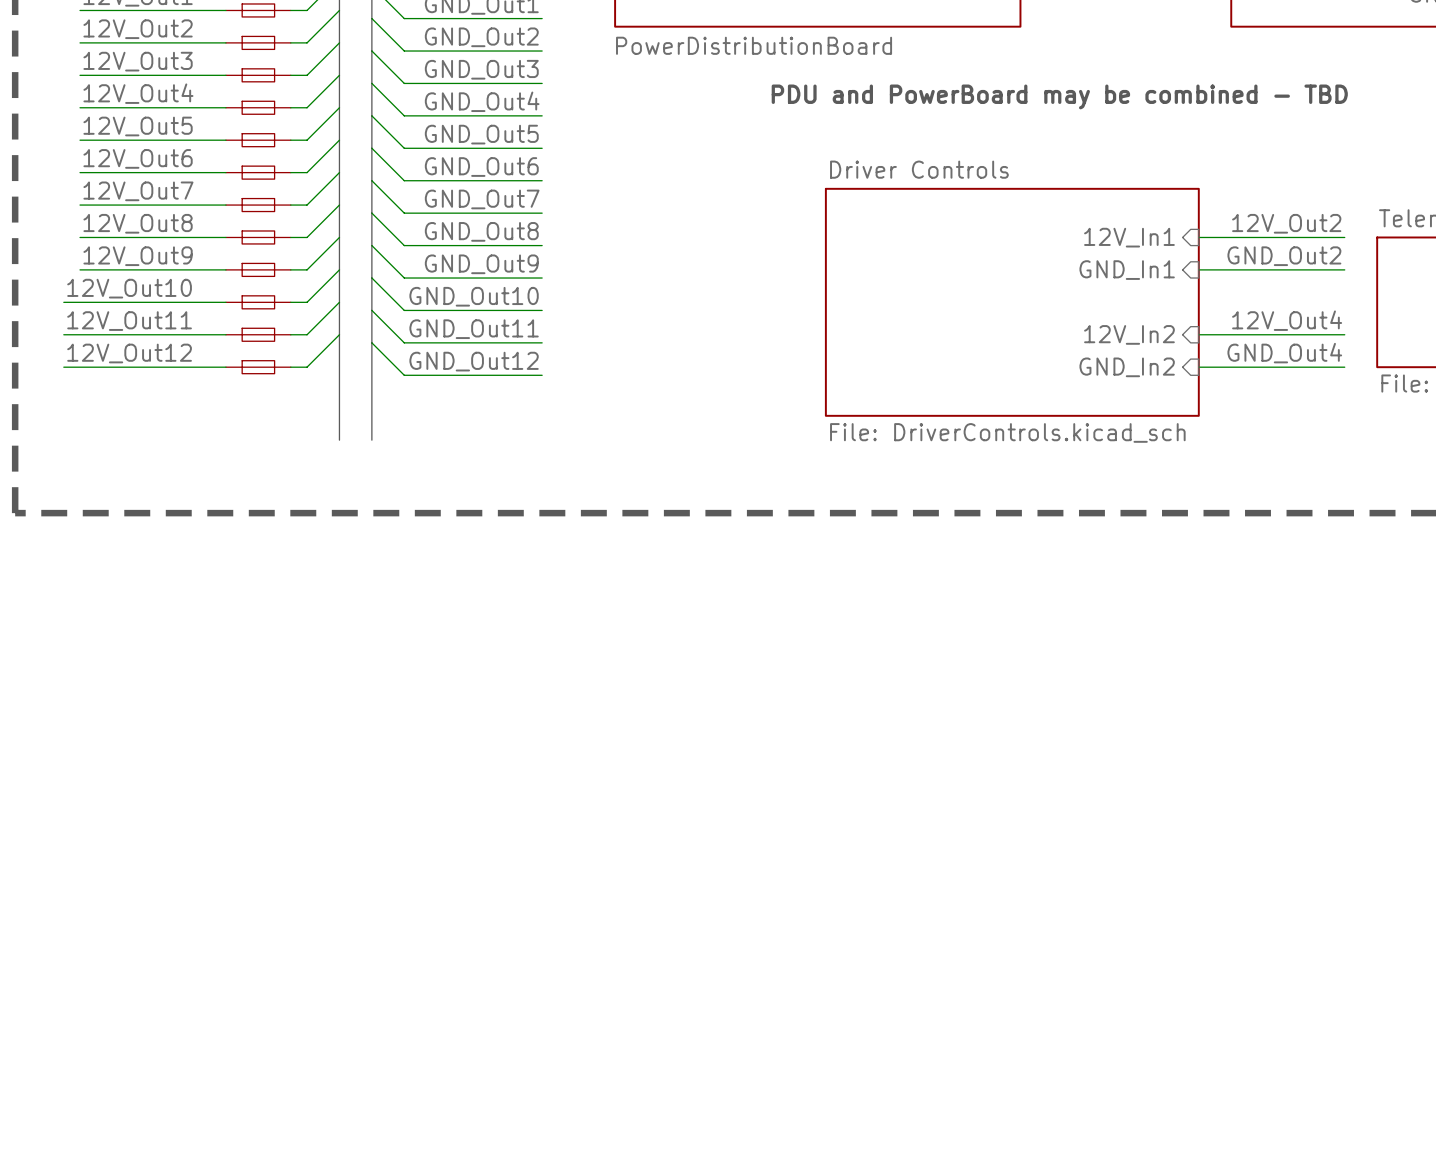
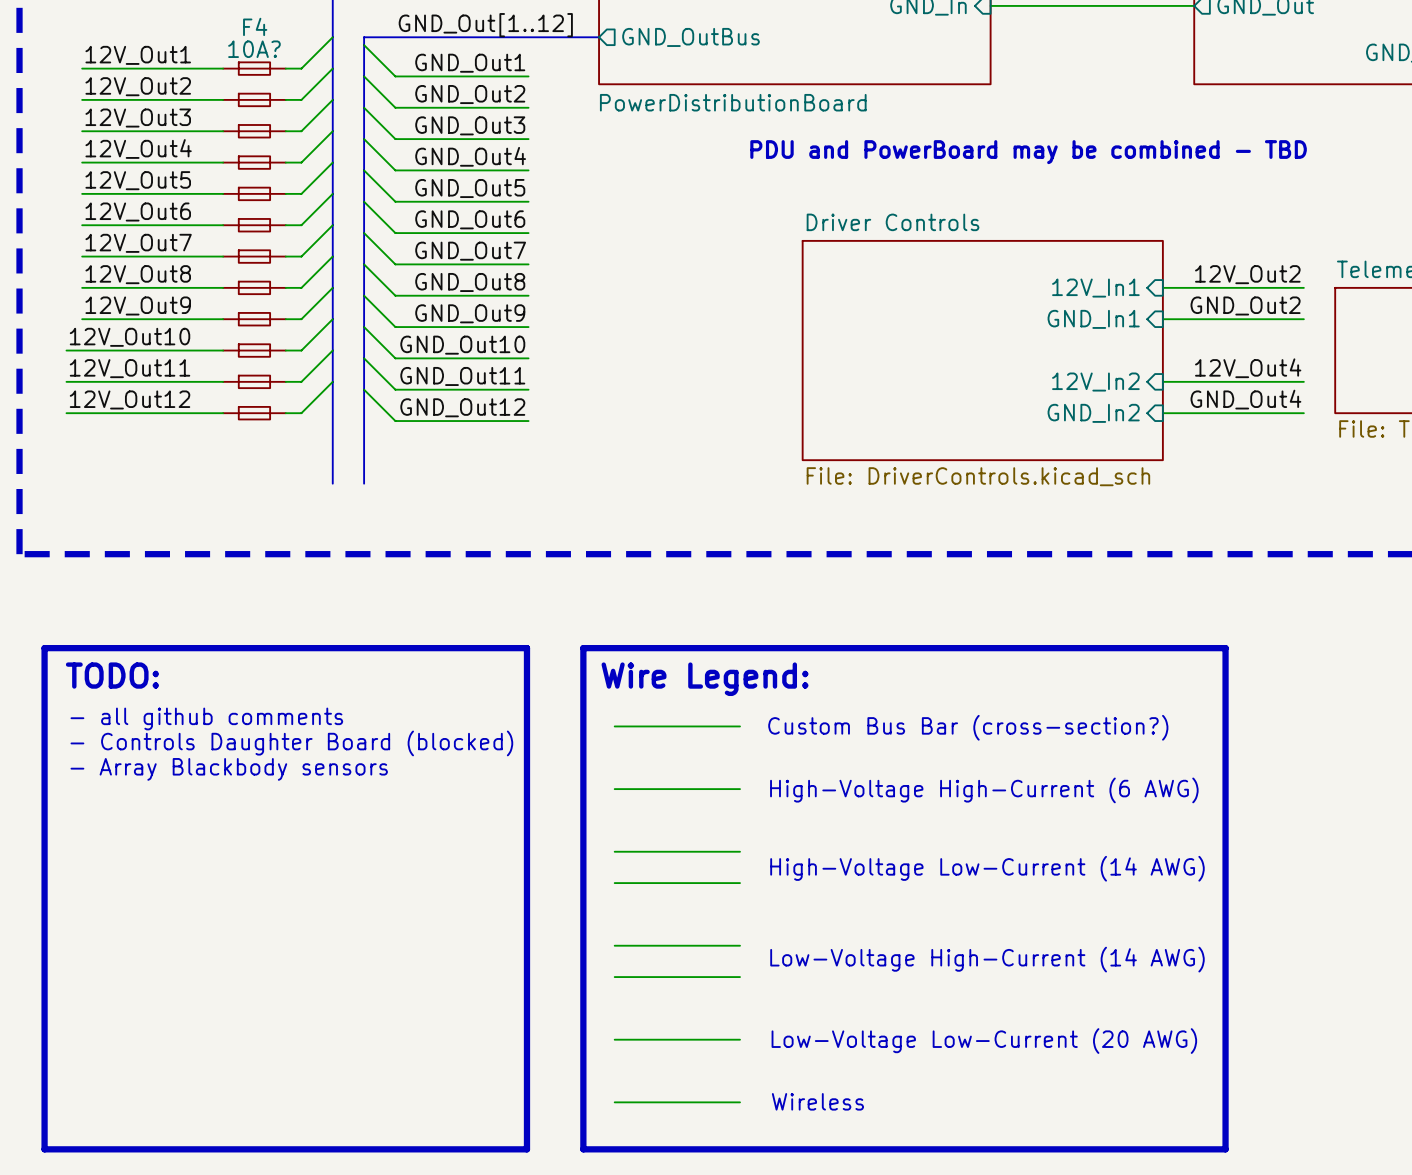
line: none -> (44, 648) (526, 648) (526, 1149) (44, 1149) (44, 648)
line: none -> (583, 648) (1225, 648) (1225, 1149) (583, 1149) (583, 648)
text: none -> TODO: (112, 675)
text: none -> Wire Legend: (705, 679)
text: none -> - all github comments (206, 718)
wire: none -> (614, 726) (740, 726)
text: none -> Custom Bus Bar (cross-section?) (968, 727)
text: none -> - Controls Daughter Board (blocked) (291, 743)
text: none -> - Array Blackbody sensors (229, 769)
wire: none -> (614, 789) (740, 789)
text: none -> High-Voltage High-Current (6 AWG) (984, 790)
wire: none -> (614, 851) (740, 851)
text: none -> High-Voltage Low-Current (14 AWG) (987, 868)
wire: none -> (614, 883) (740, 883)
wire: none -> (614, 945) (740, 945)
text: none -> Low-Voltage High-Current (14 AWG) (987, 959)
wire: none -> (614, 977) (740, 977)
wire: none -> (614, 1039) (740, 1039)
text: none -> Low-Voltage Low-Current (20 AWG) (984, 1041)
wire: none -> (614, 1102) (740, 1102)
text: none -> Wireless (817, 1101)

